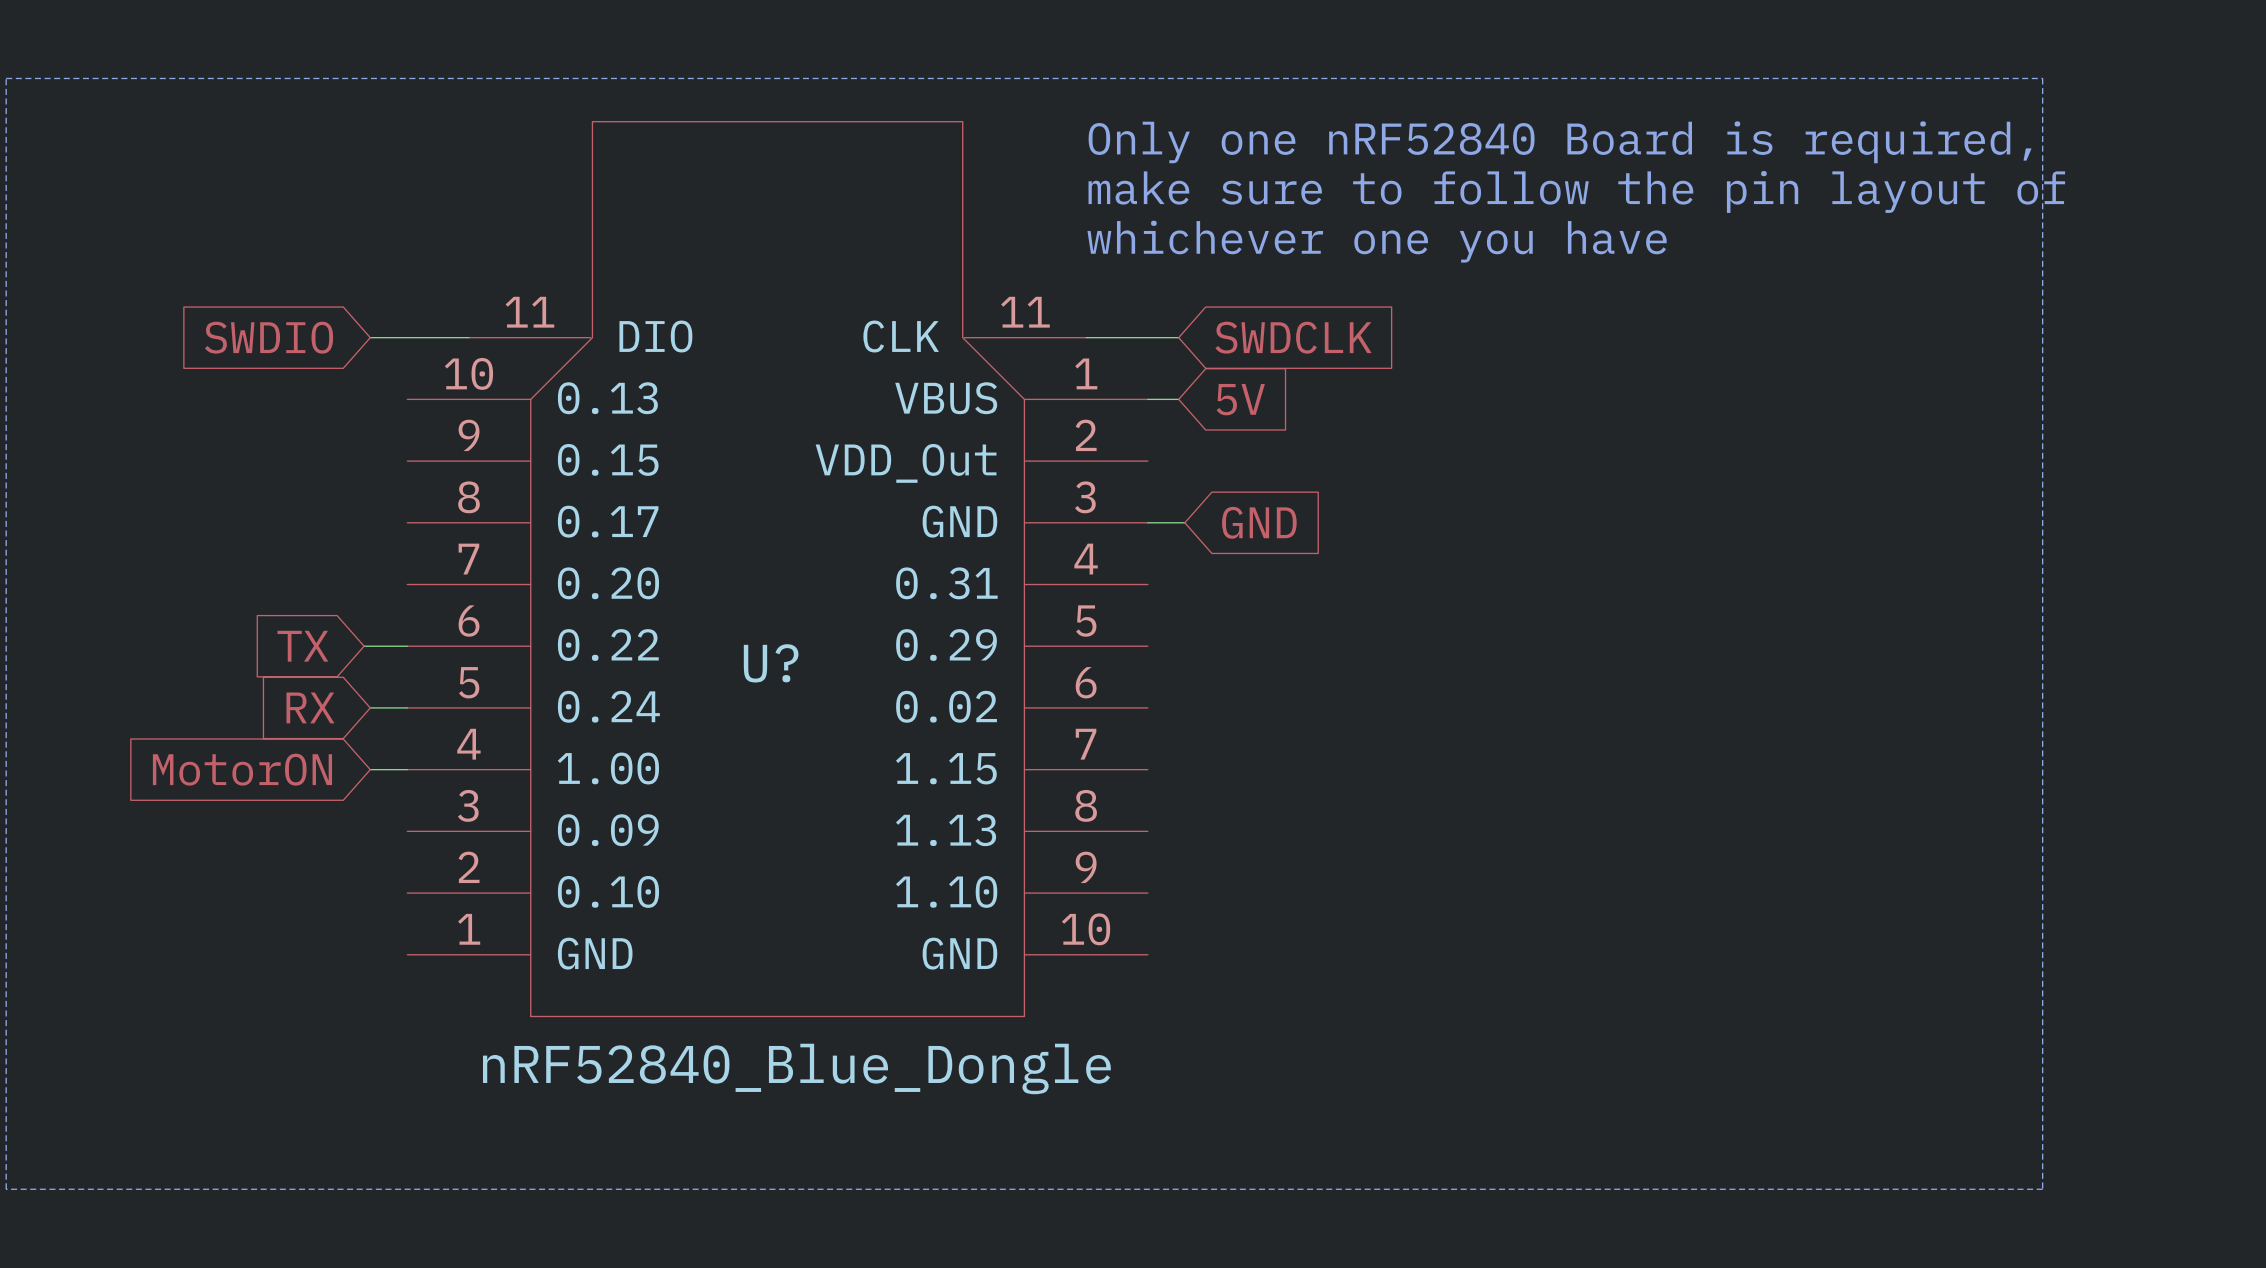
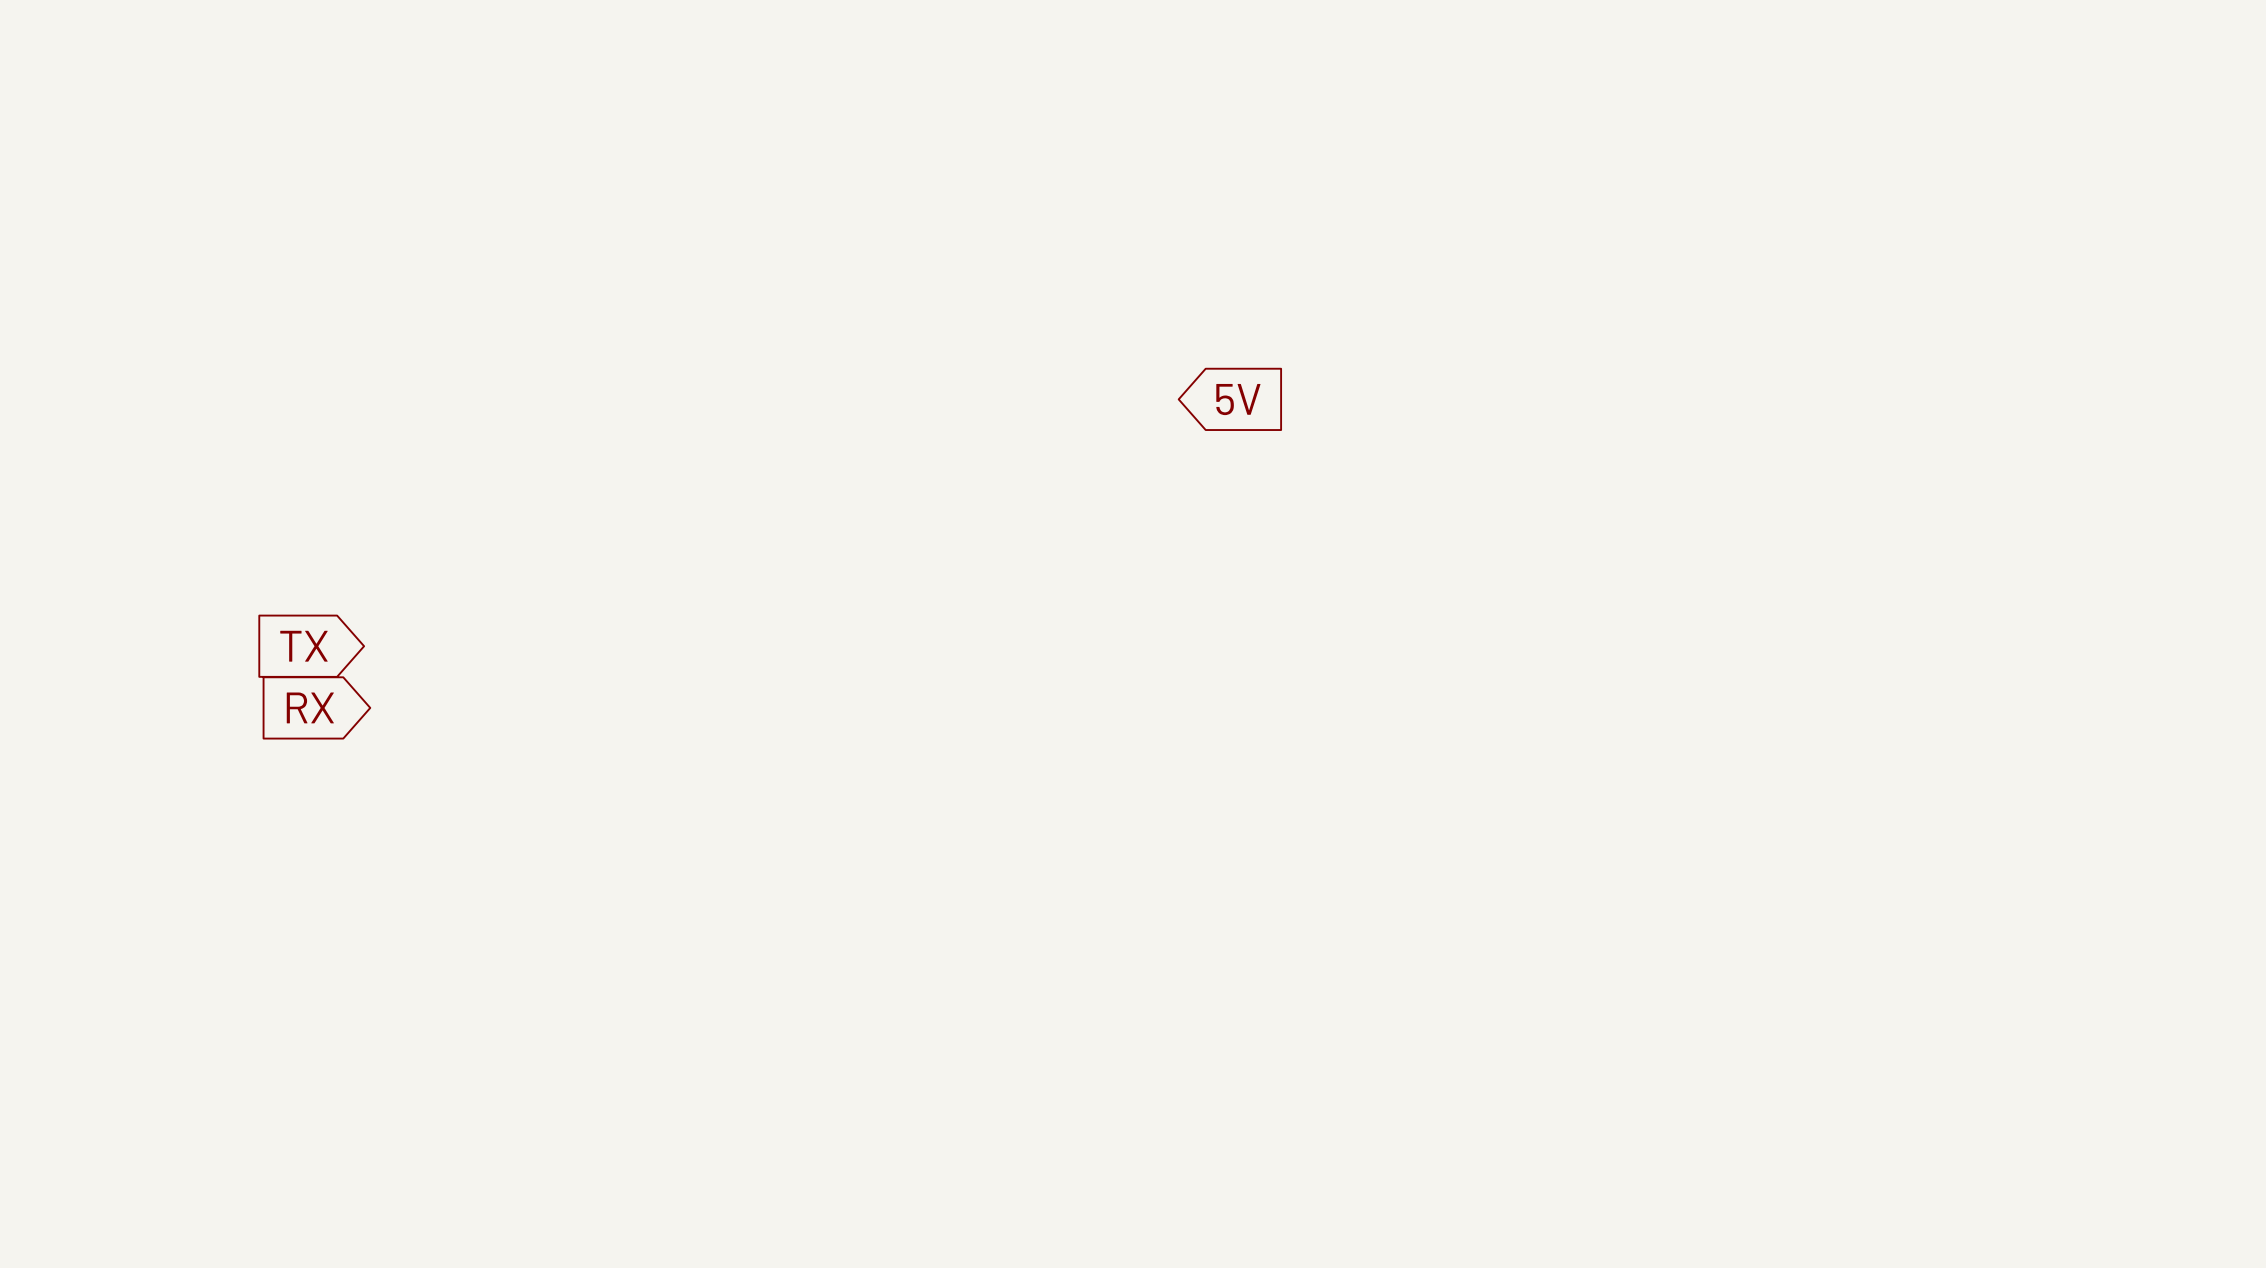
line: (6, 78) (2042, 78) (2042, 1189) (6, 1189) (6, 78) -> none
text: Only one nRF52840 Board is required, (1560, 142) -> none
text: make sure to follow the pin layout of (1576, 191) -> none
text: whichever one you have (1377, 241) -> none
global label: SWDIO (269, 337) -> none
wire: (370, 337) (469, 337) -> none
wire: (1086, 337) (1178, 337) -> none
global label: SWDCLK (1293, 337) -> none
wire: (1147, 399) (1178, 399) -> none
wire: (1147, 522) (1184, 522) -> none
global label: GND (1259, 522) -> none
U?: nRF52840_Blue_Dongle (777, 569) -> none
wire: (364, 646) (407, 646) -> none
wire: (370, 707) (407, 707) -> none
global label: MotorON (242, 769) -> none
wire: (370, 769) (407, 769) -> none

